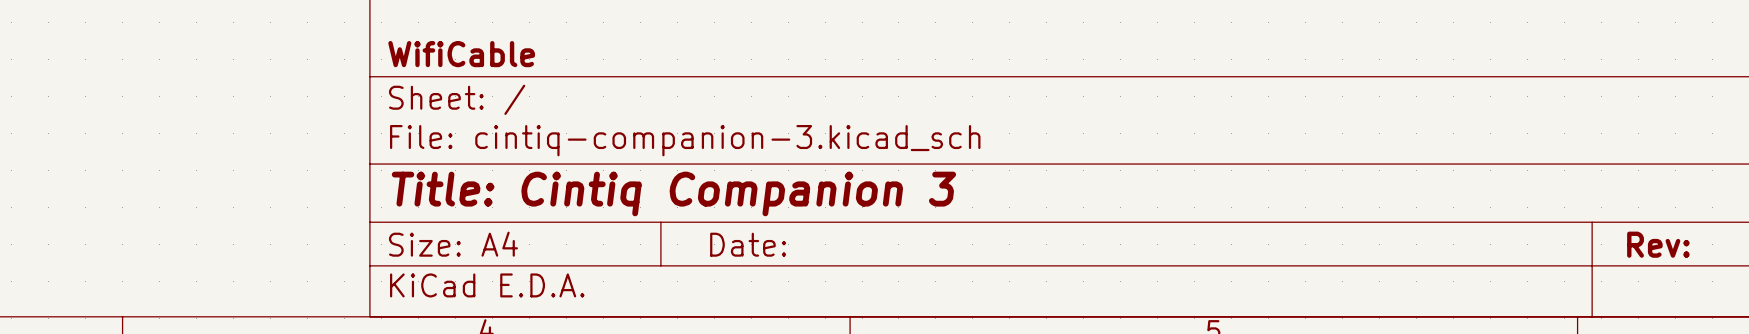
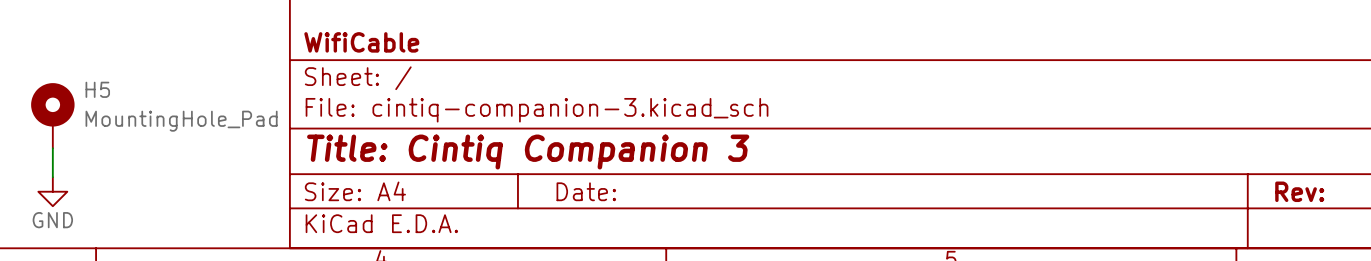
H5: none -> MountingHole_Pad (52, 115)
wire: none -> (52, 148) (52, 177)
power symbol: none -> GND (52, 191)

